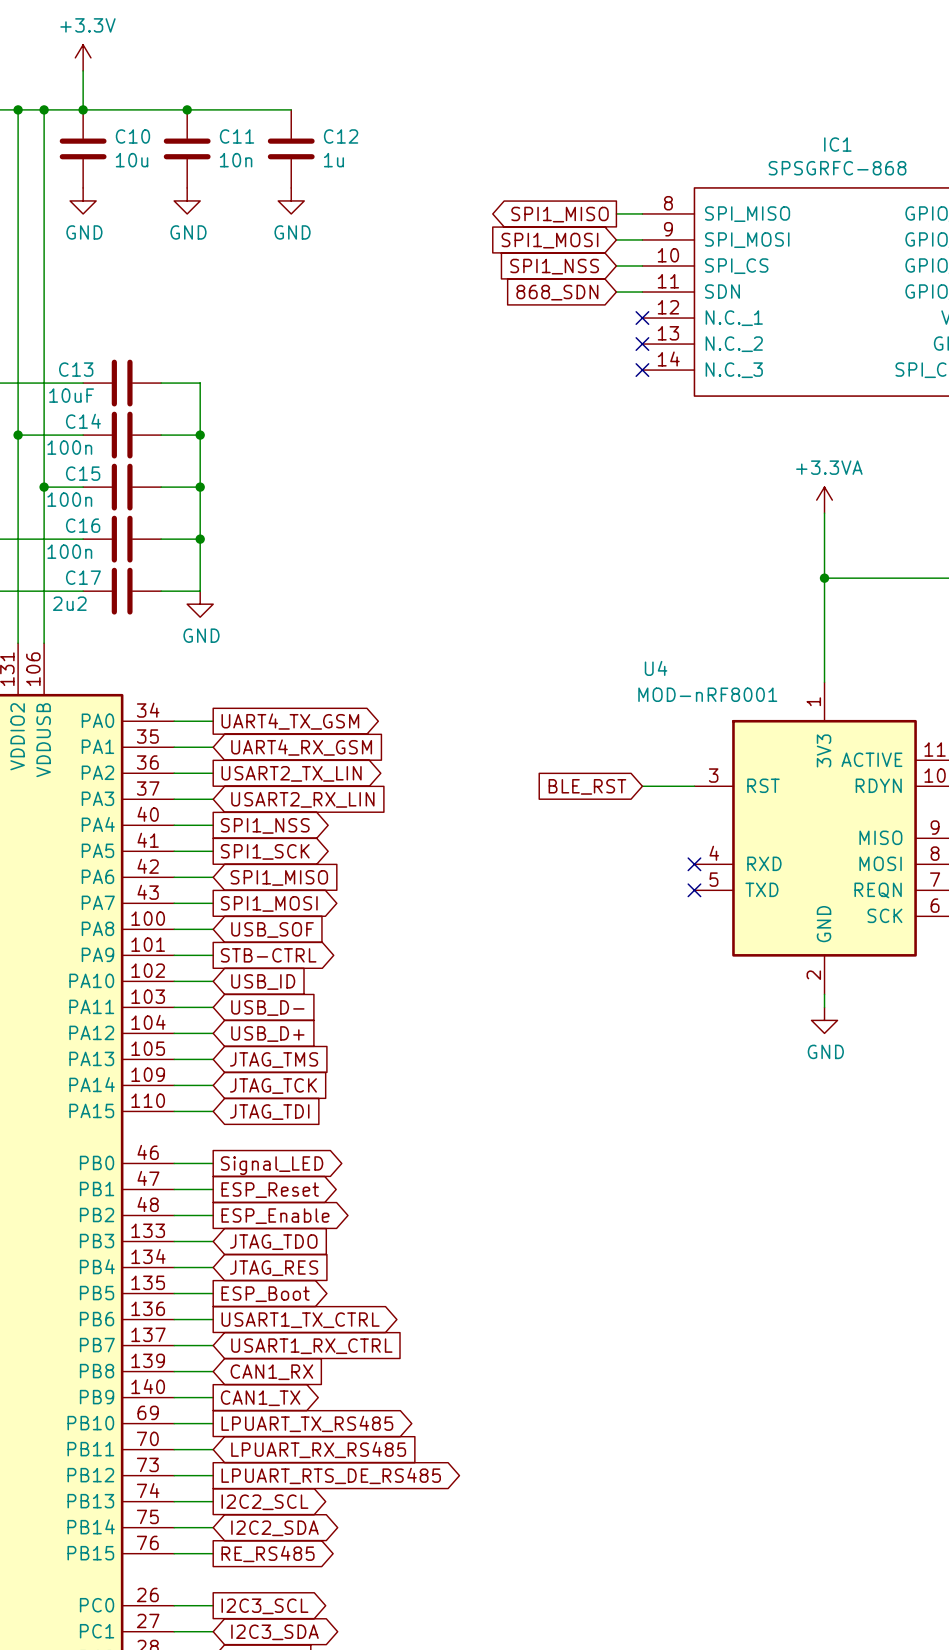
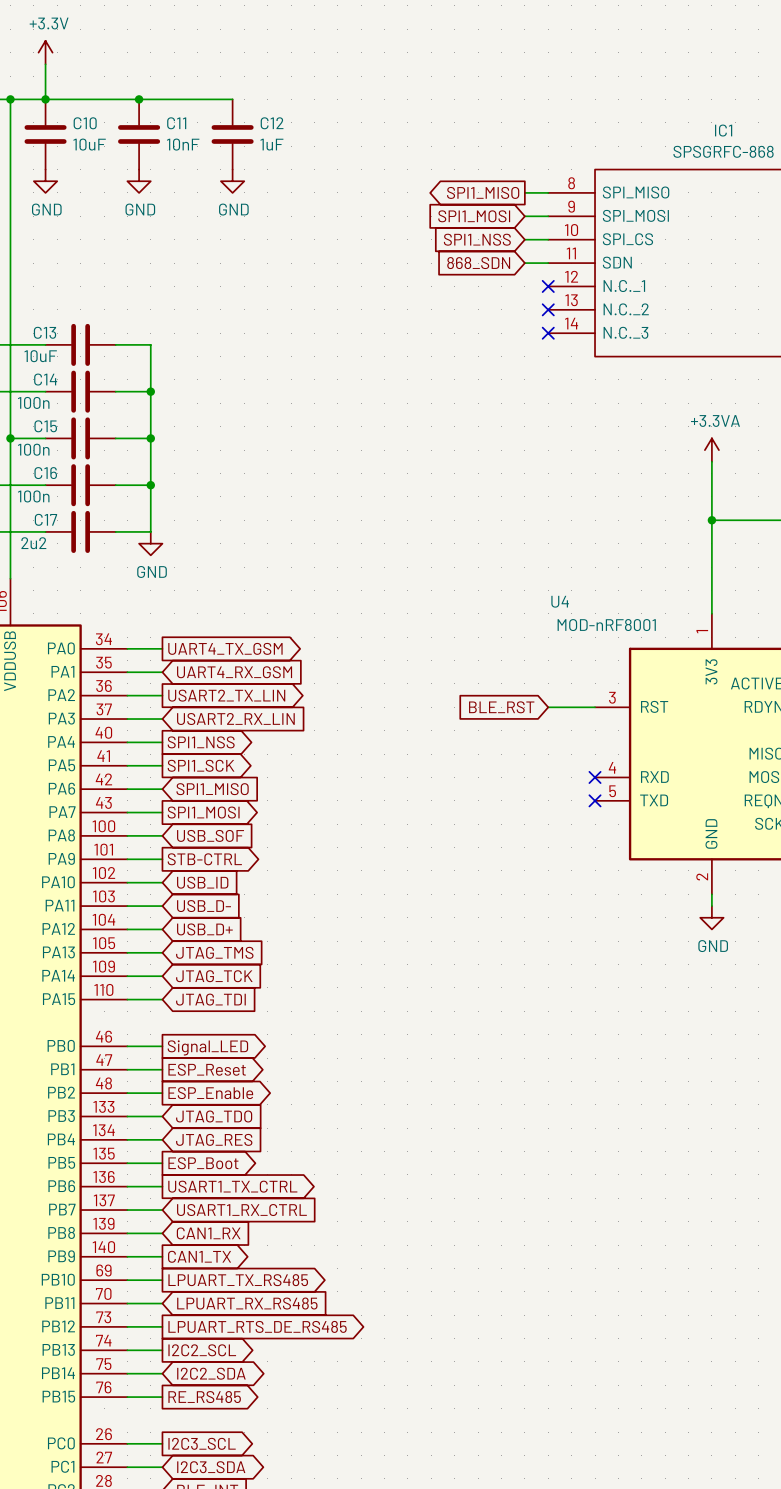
C10 value: 10u (132, 160) -> 10uF (89, 144)
C11 value: 10n (236, 160) -> 10nF (183, 144)
C12 value: 1u (333, 160) -> 1uF (271, 144)

